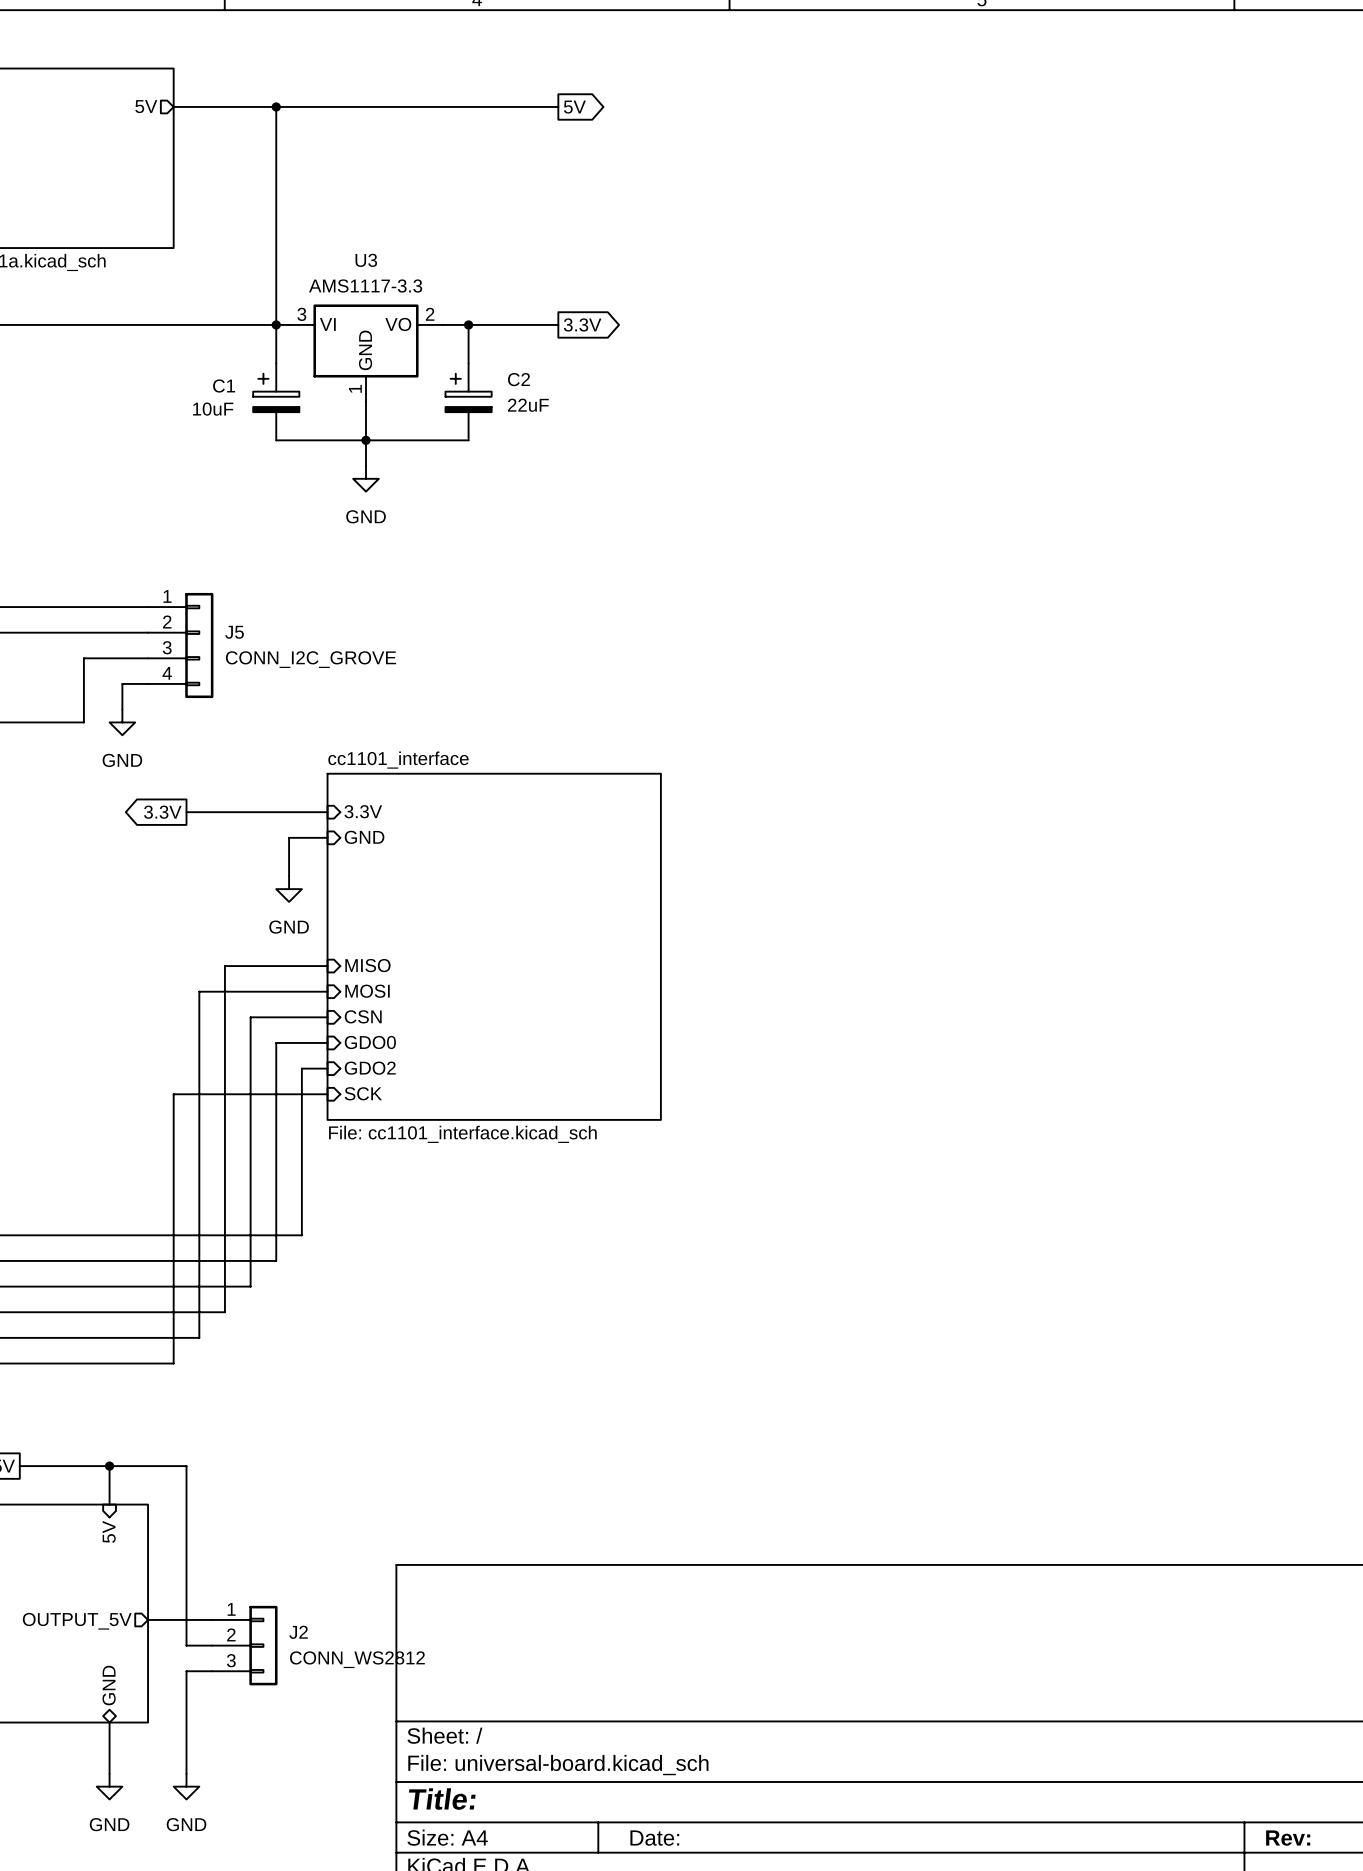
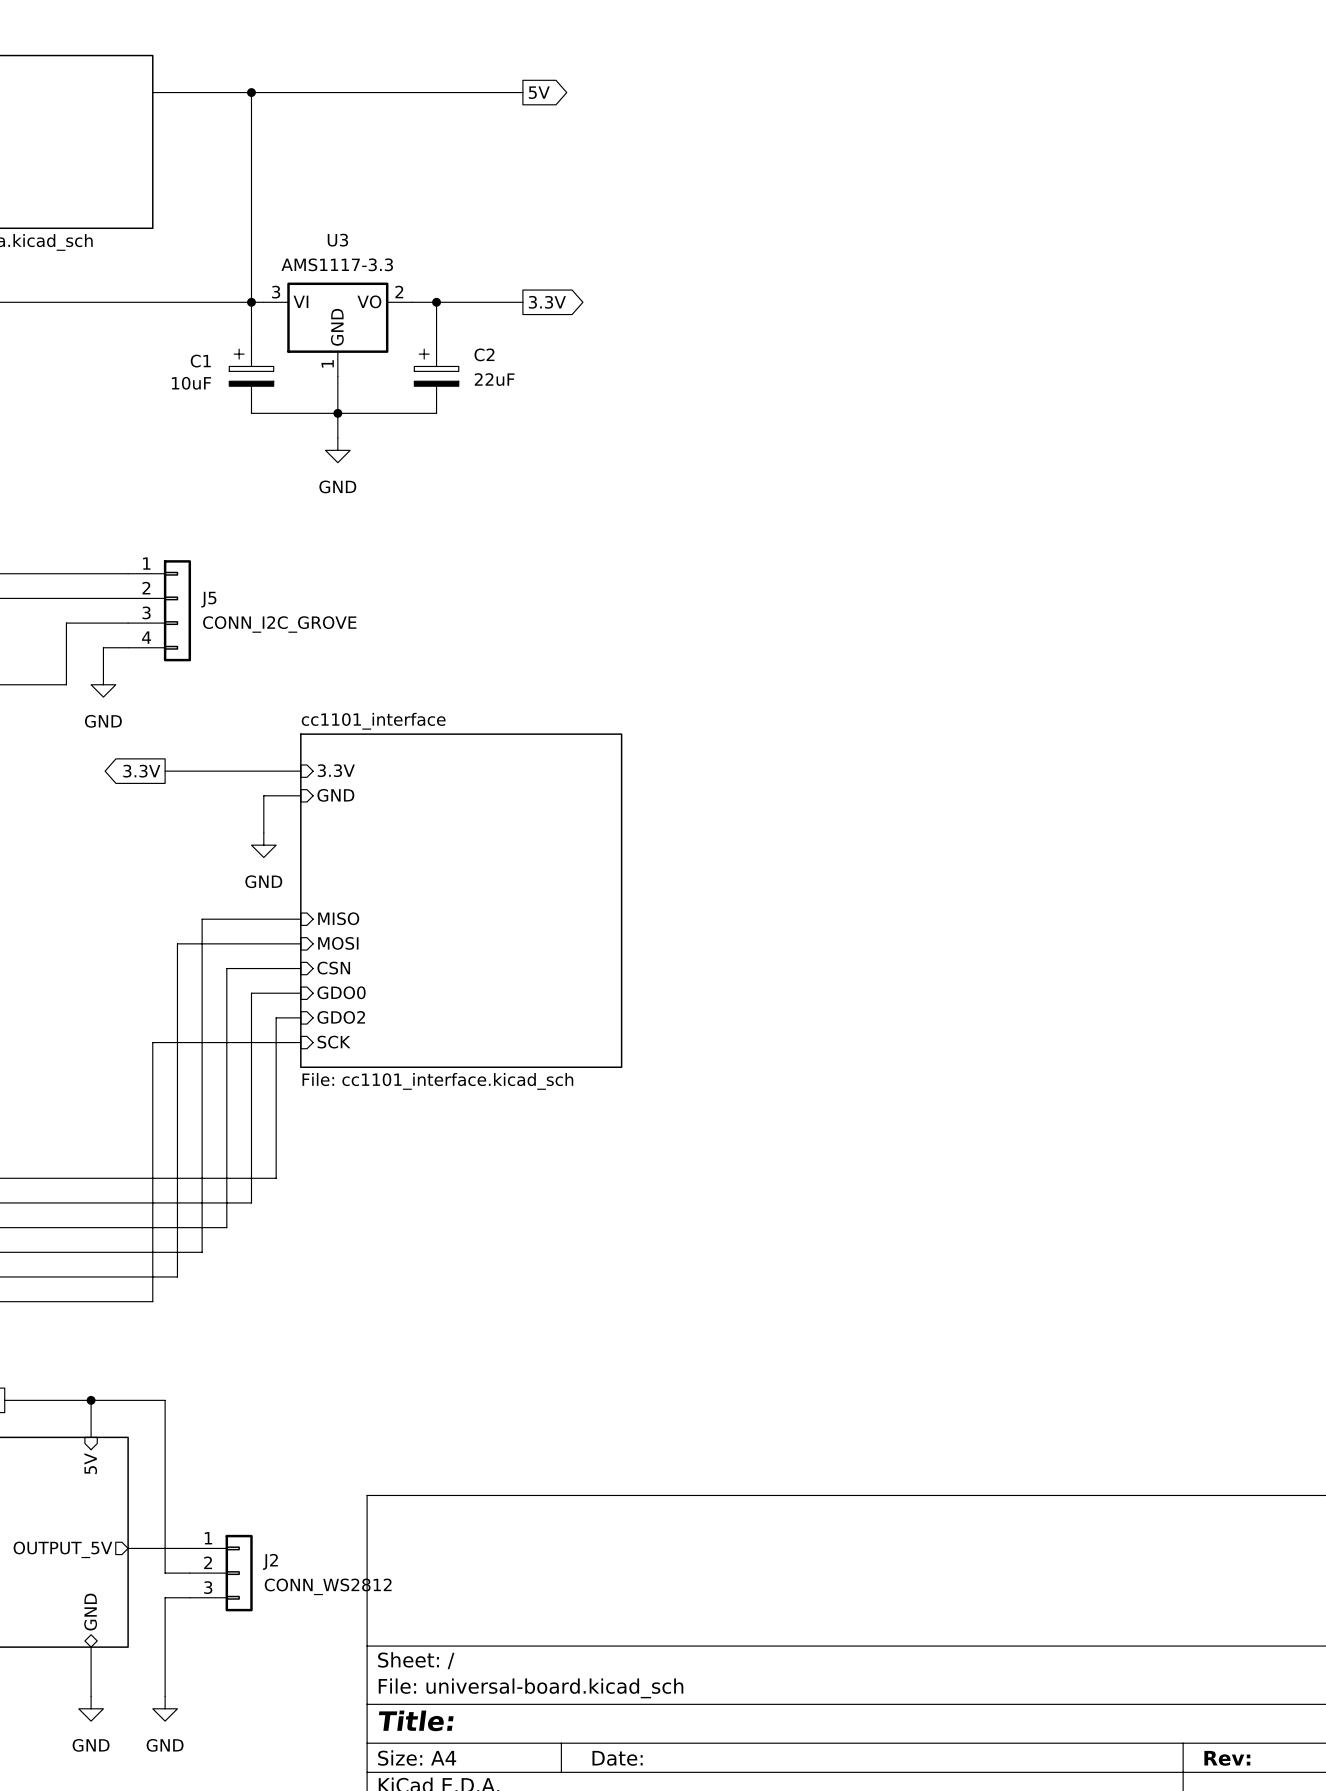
sheet pin: 5V (146, 106) -> none

